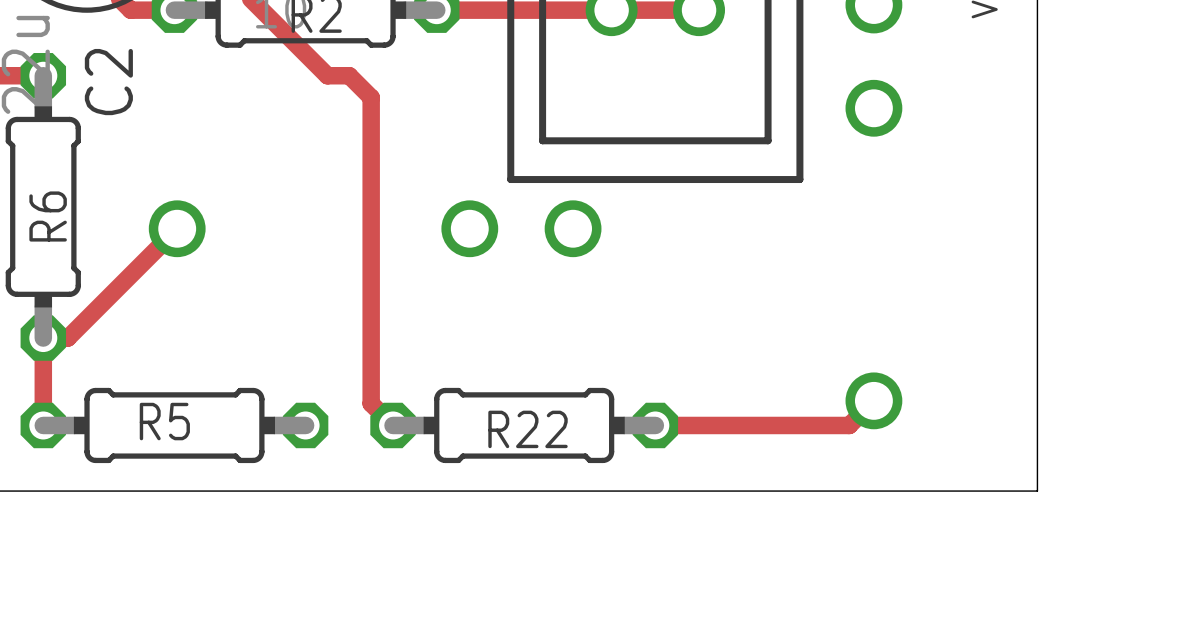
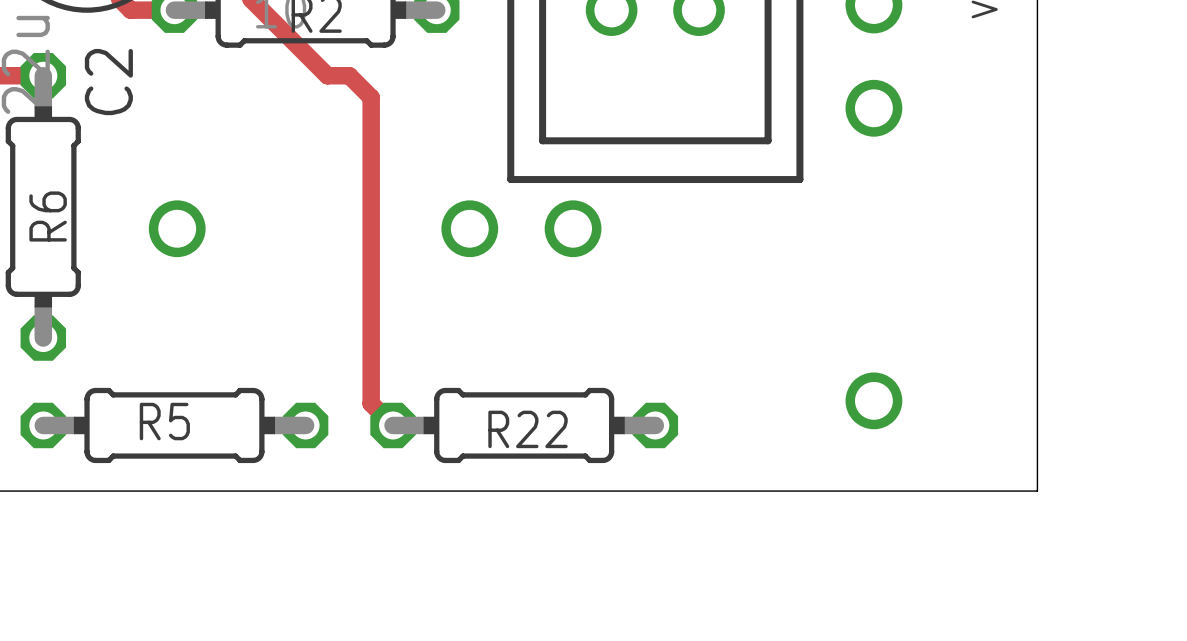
track: (436, 10) (699, 10) -> none
track: (177, 228) (67, 338) (43, 338) -> none
track: (46, 338) (43, 340) (43, 425) -> none
track: (873, 400) (849, 425) (655, 425) -> none

